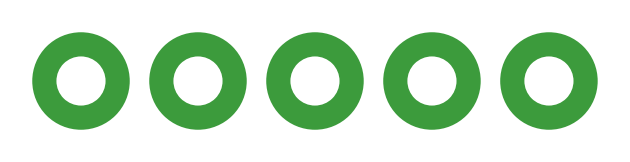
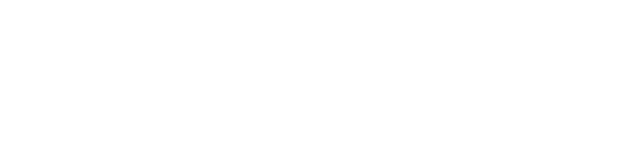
part: (81, 81) -> none
part: (197, 81) -> none
part: (314, 81) -> none
part: (431, 81) -> none
part: (548, 81) -> none

